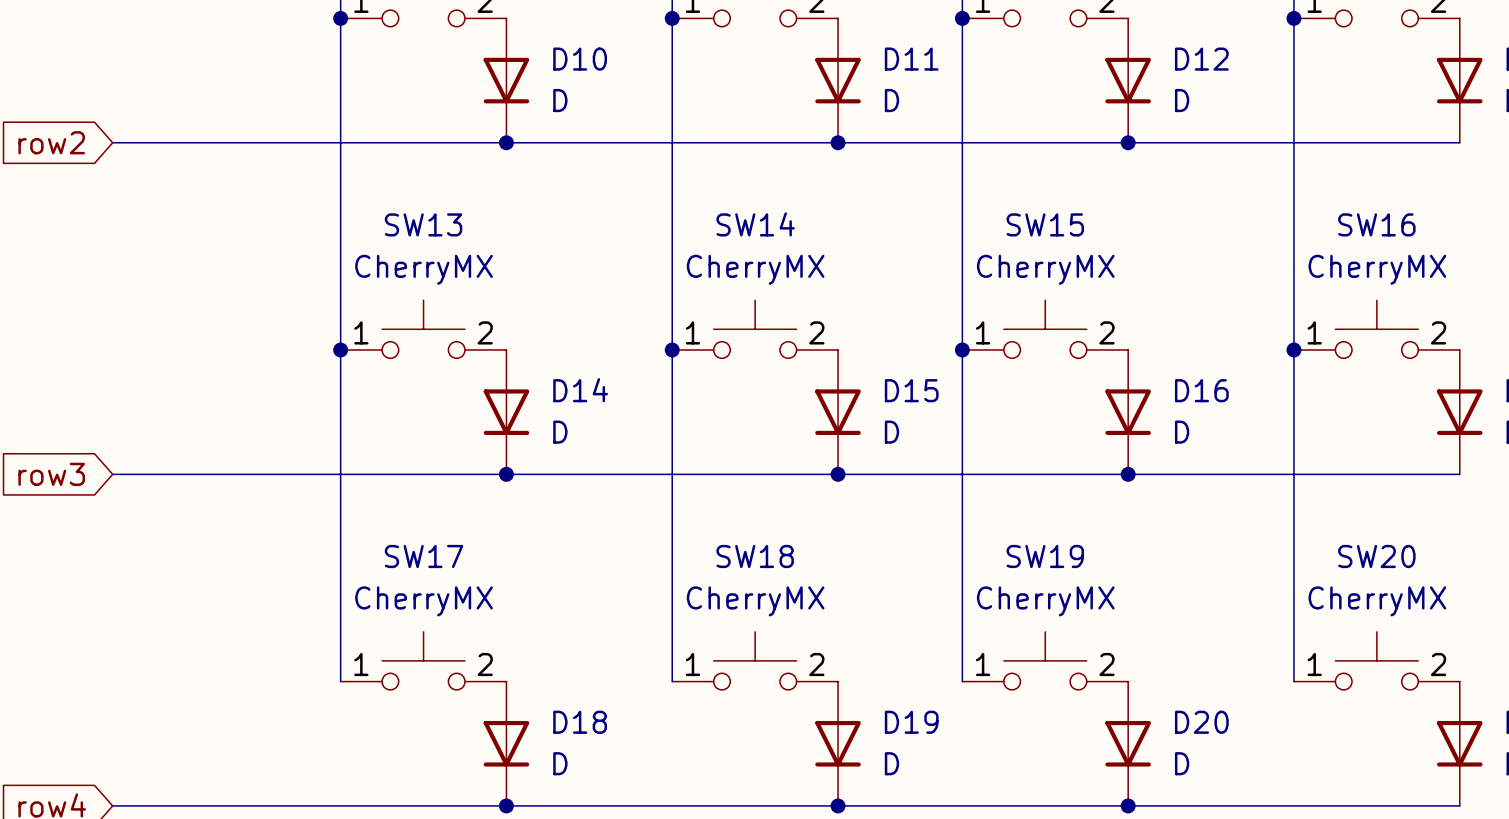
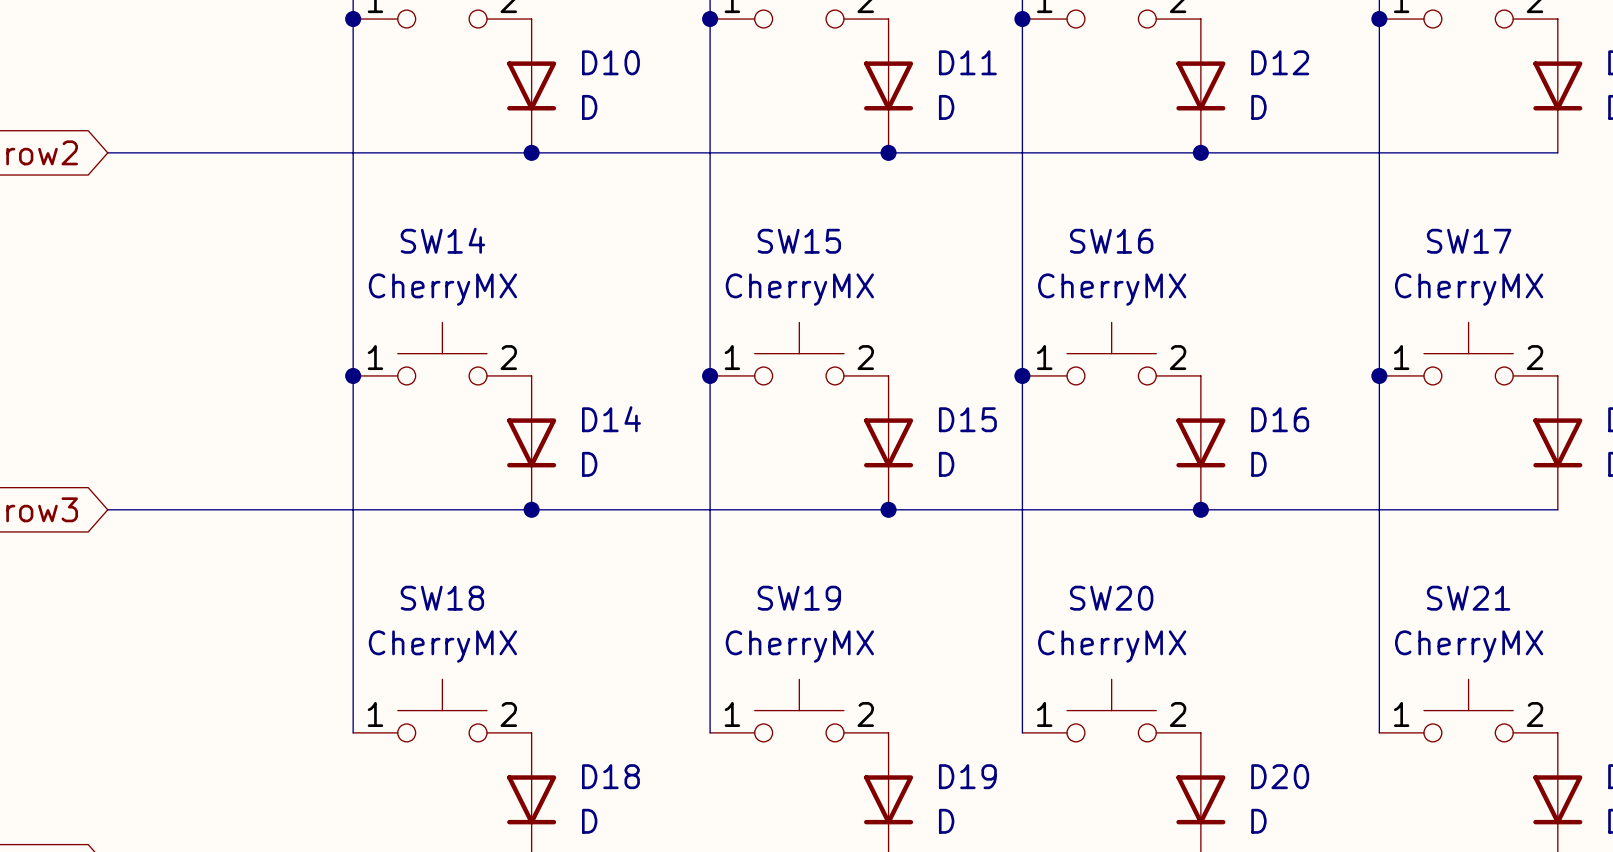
SW13 name: SW13 (423, 224) -> SW14 (442, 240)
SW14 name: SW14 (755, 224) -> SW15 (799, 241)
SW15 name: SW15 (1045, 224) -> SW16 (1111, 241)
SW16 name: SW16 (1376, 224) -> SW17 (1469, 241)
SW17 name: SW17 (424, 556) -> SW18 (442, 598)
SW18 name: SW18 (755, 556) -> SW19 (799, 598)
SW19 name: SW19 (1045, 556) -> SW20 (1111, 598)
SW20 name: SW20 (1376, 556) -> SW21 (1468, 598)

